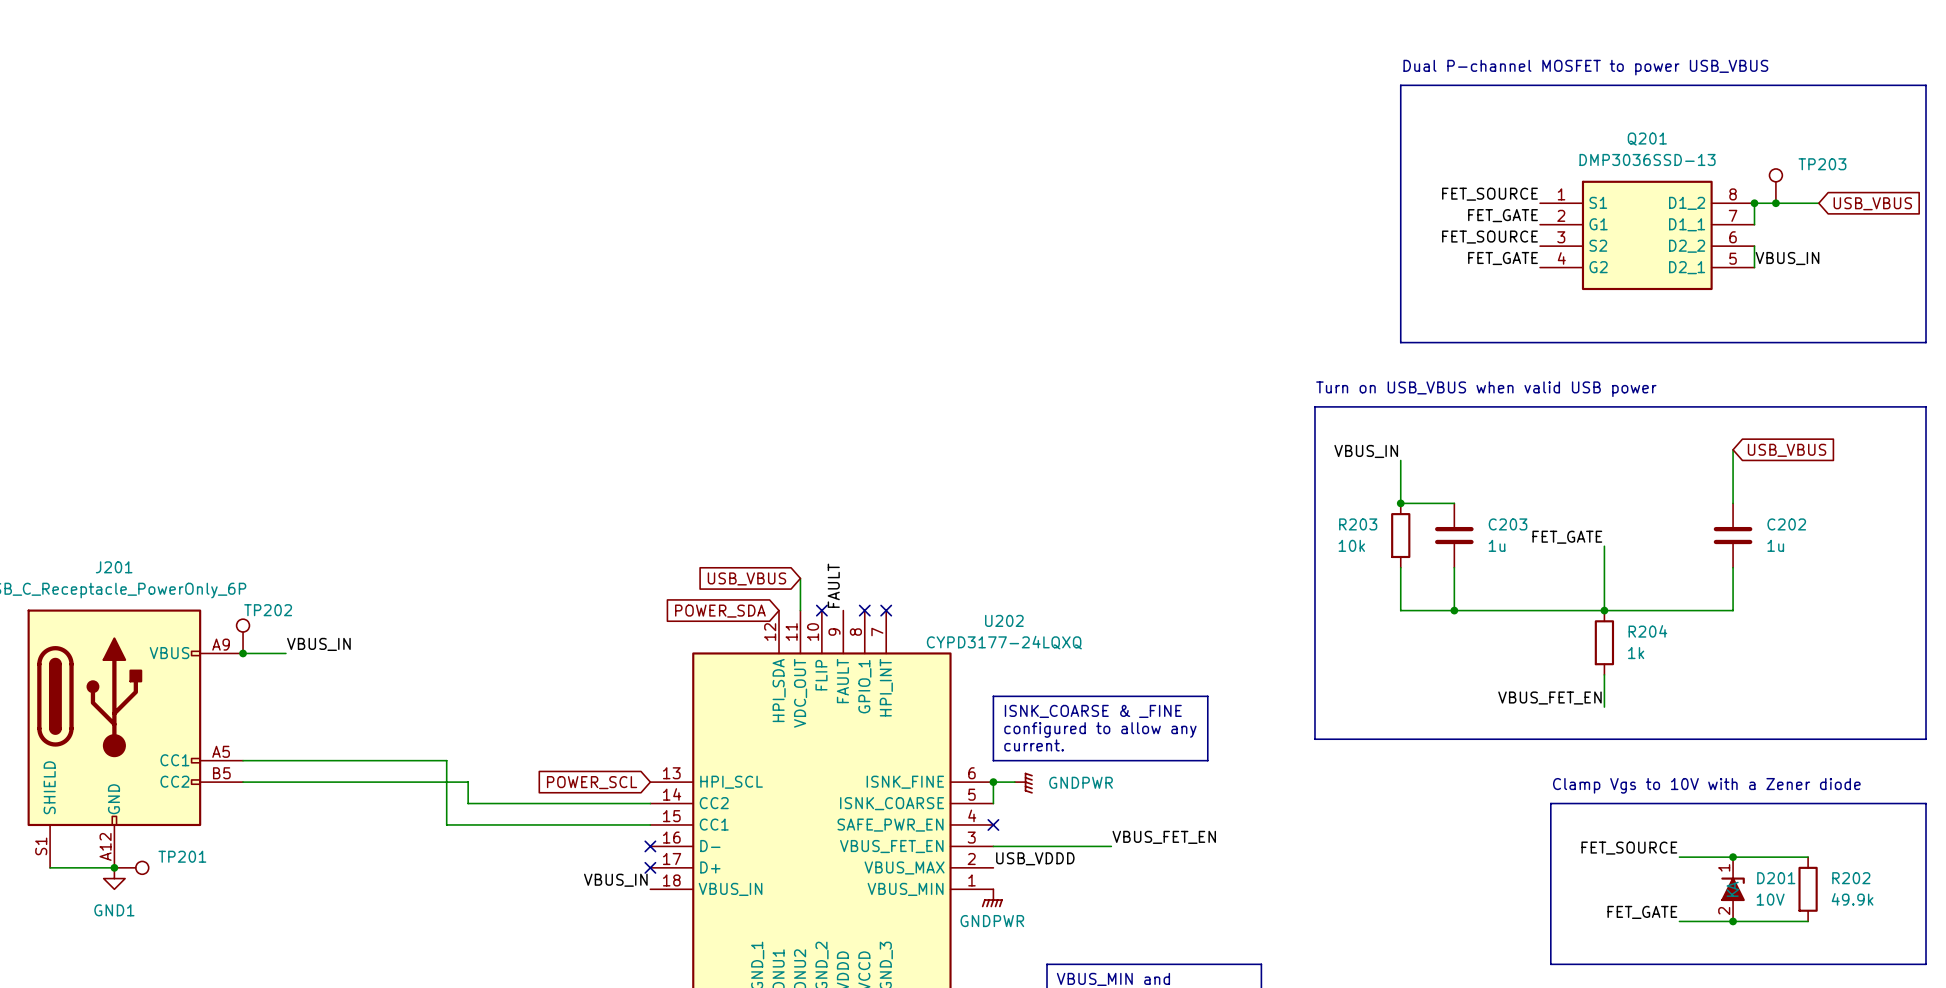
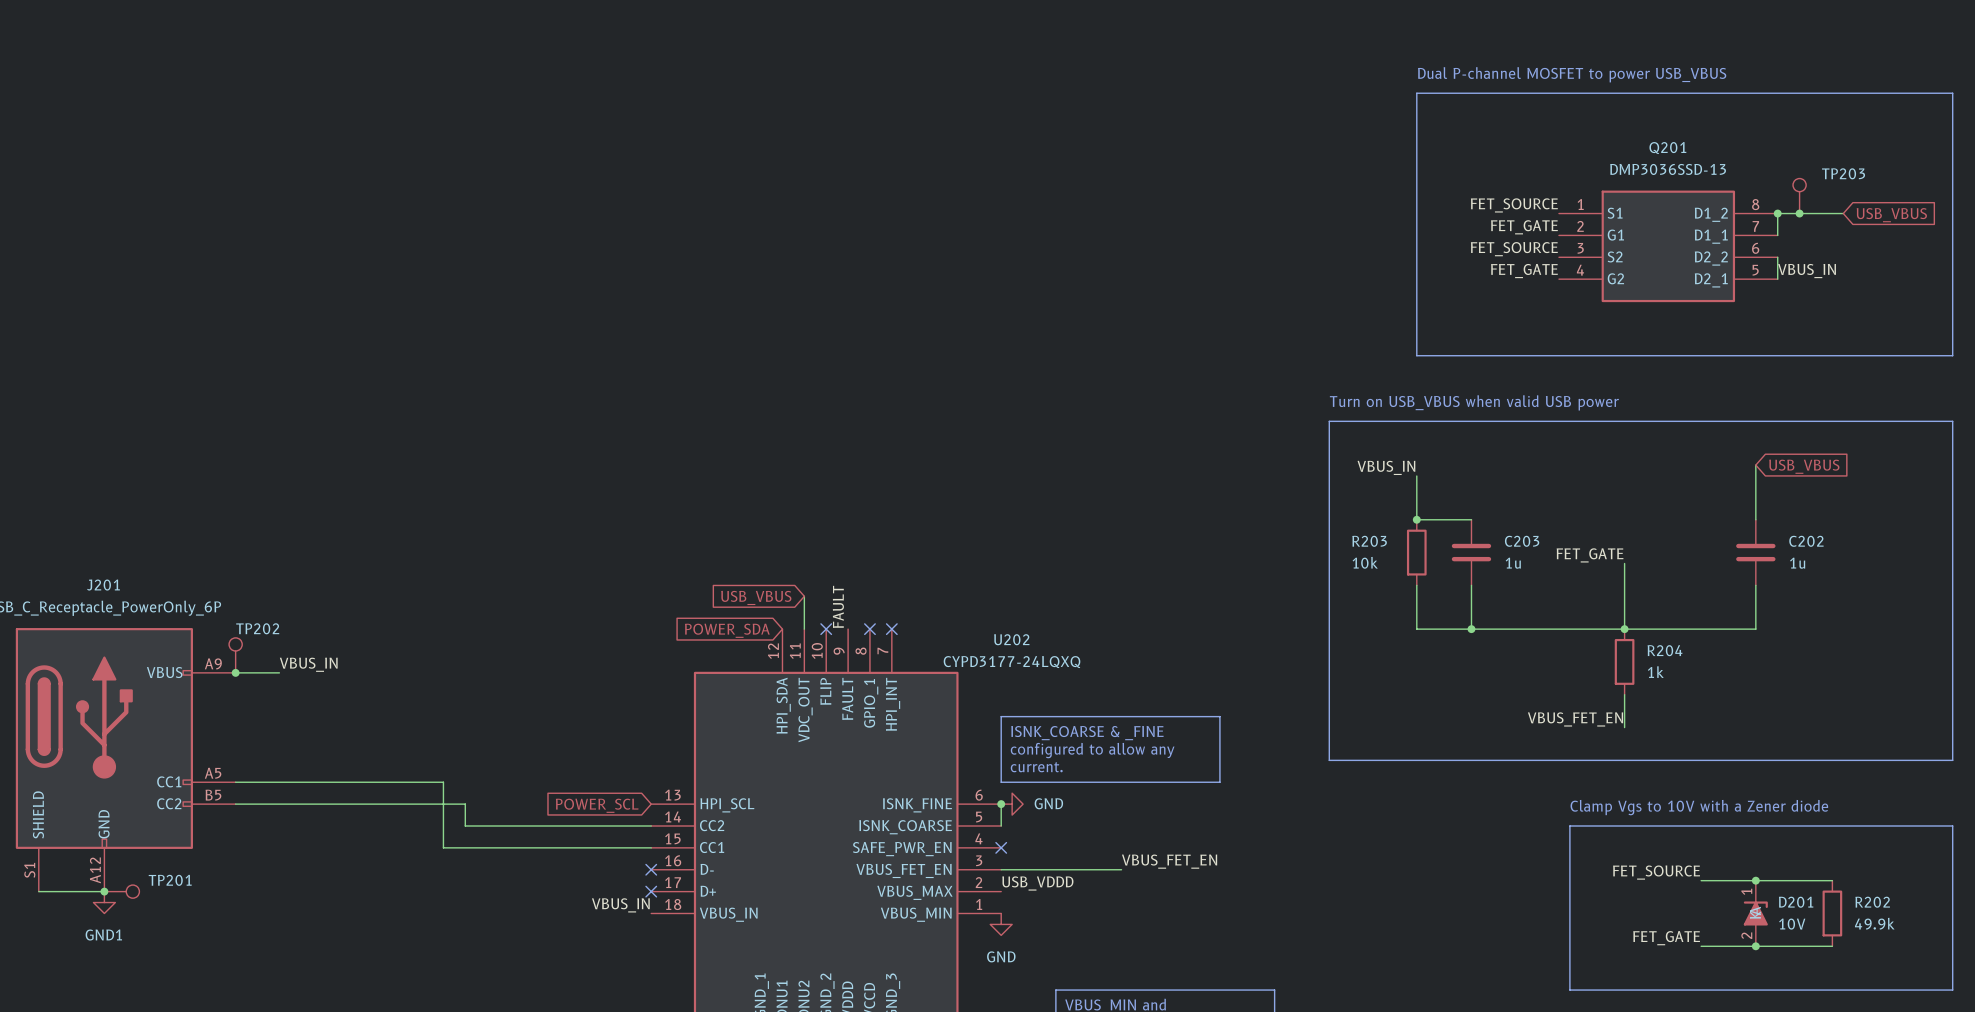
power symbol: none -> GND (1012, 804)
power symbol: GNDPWR (1023, 783) -> none
power symbol: GNDPWR (992, 898) -> GND (1001, 924)

